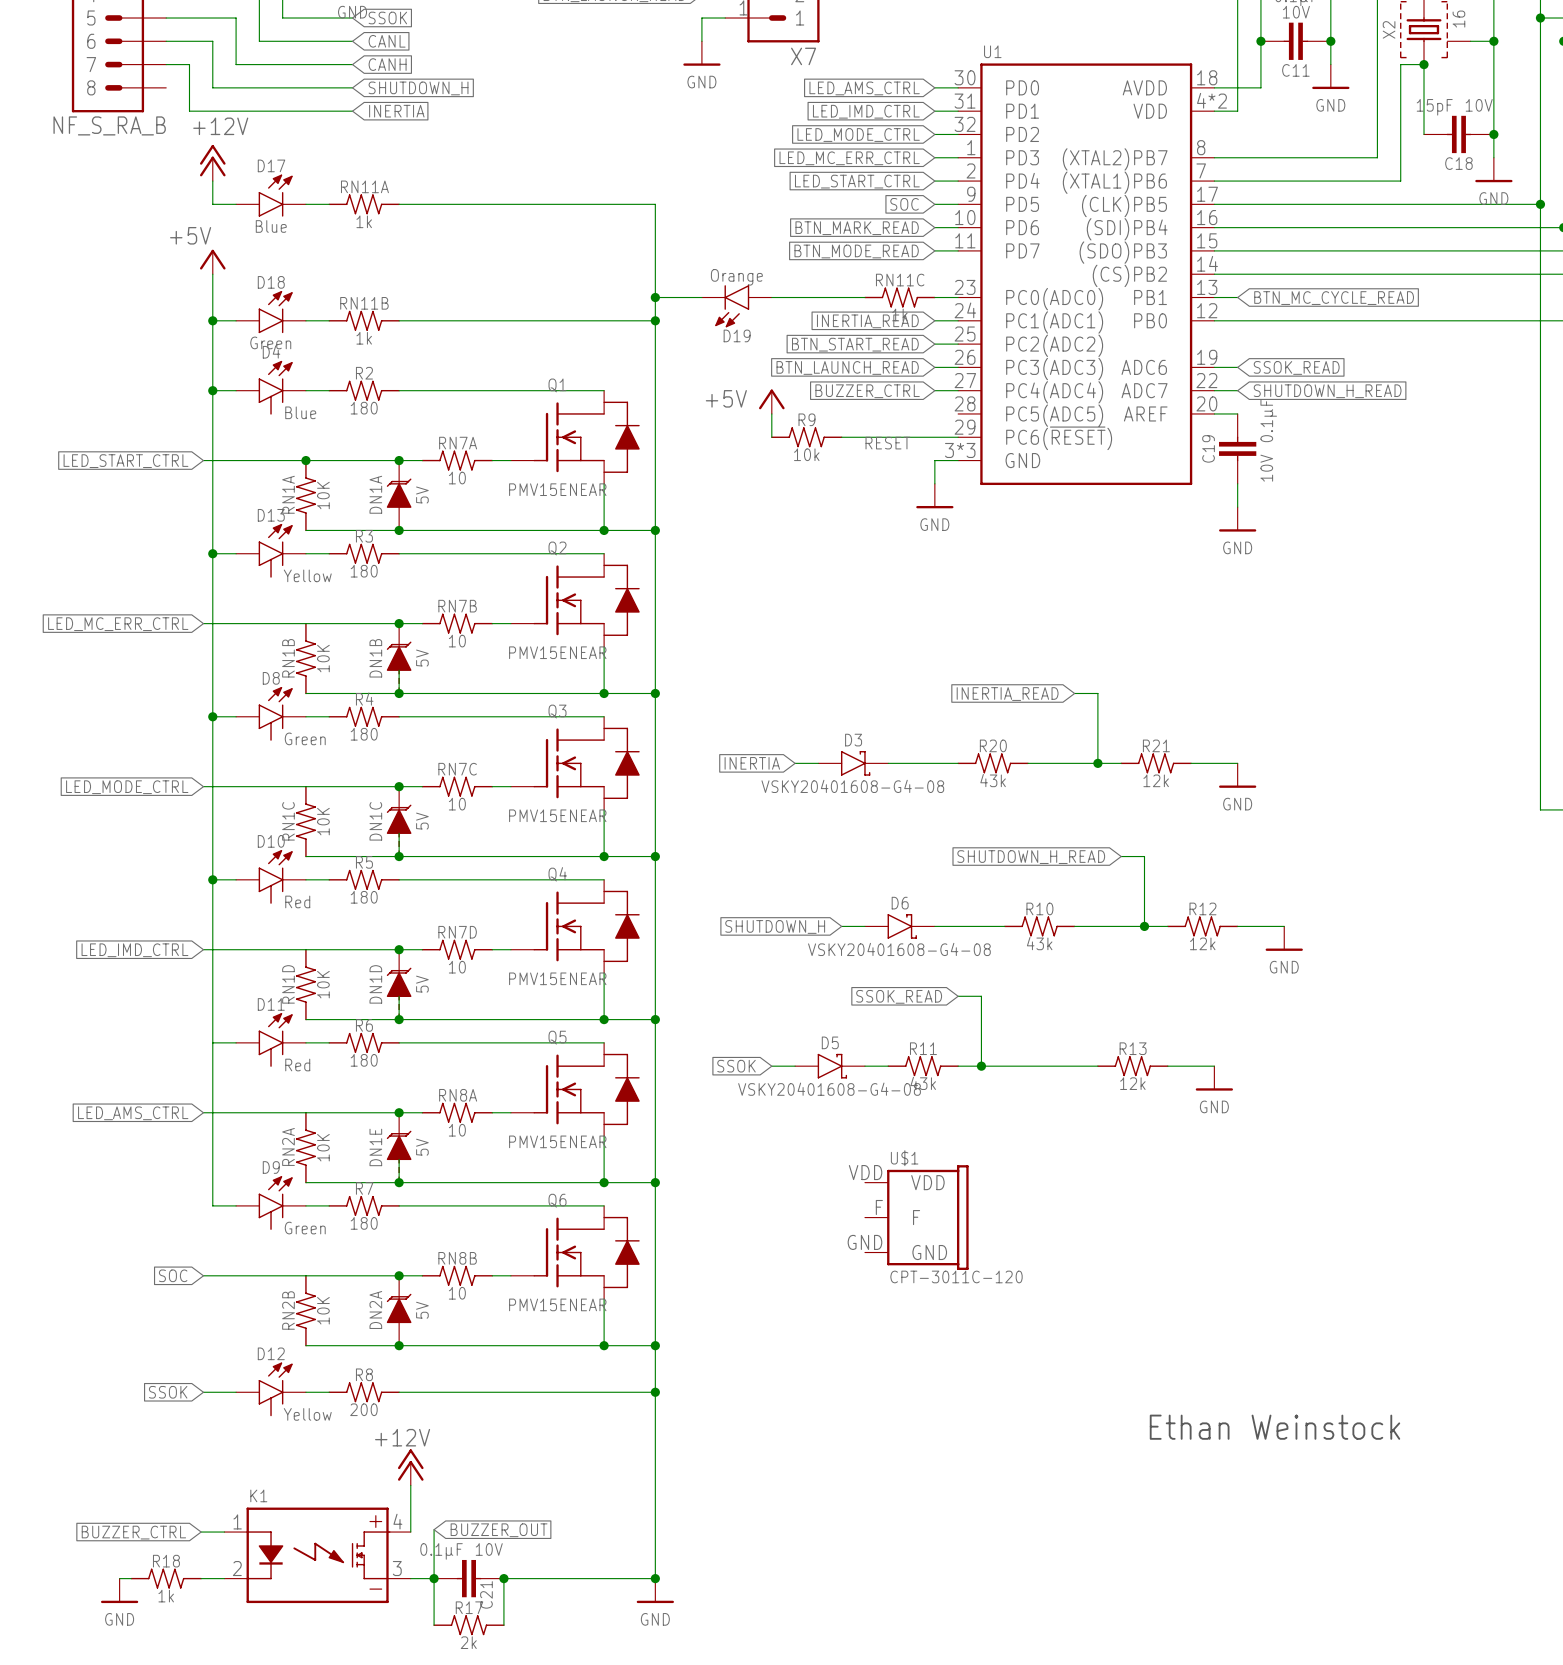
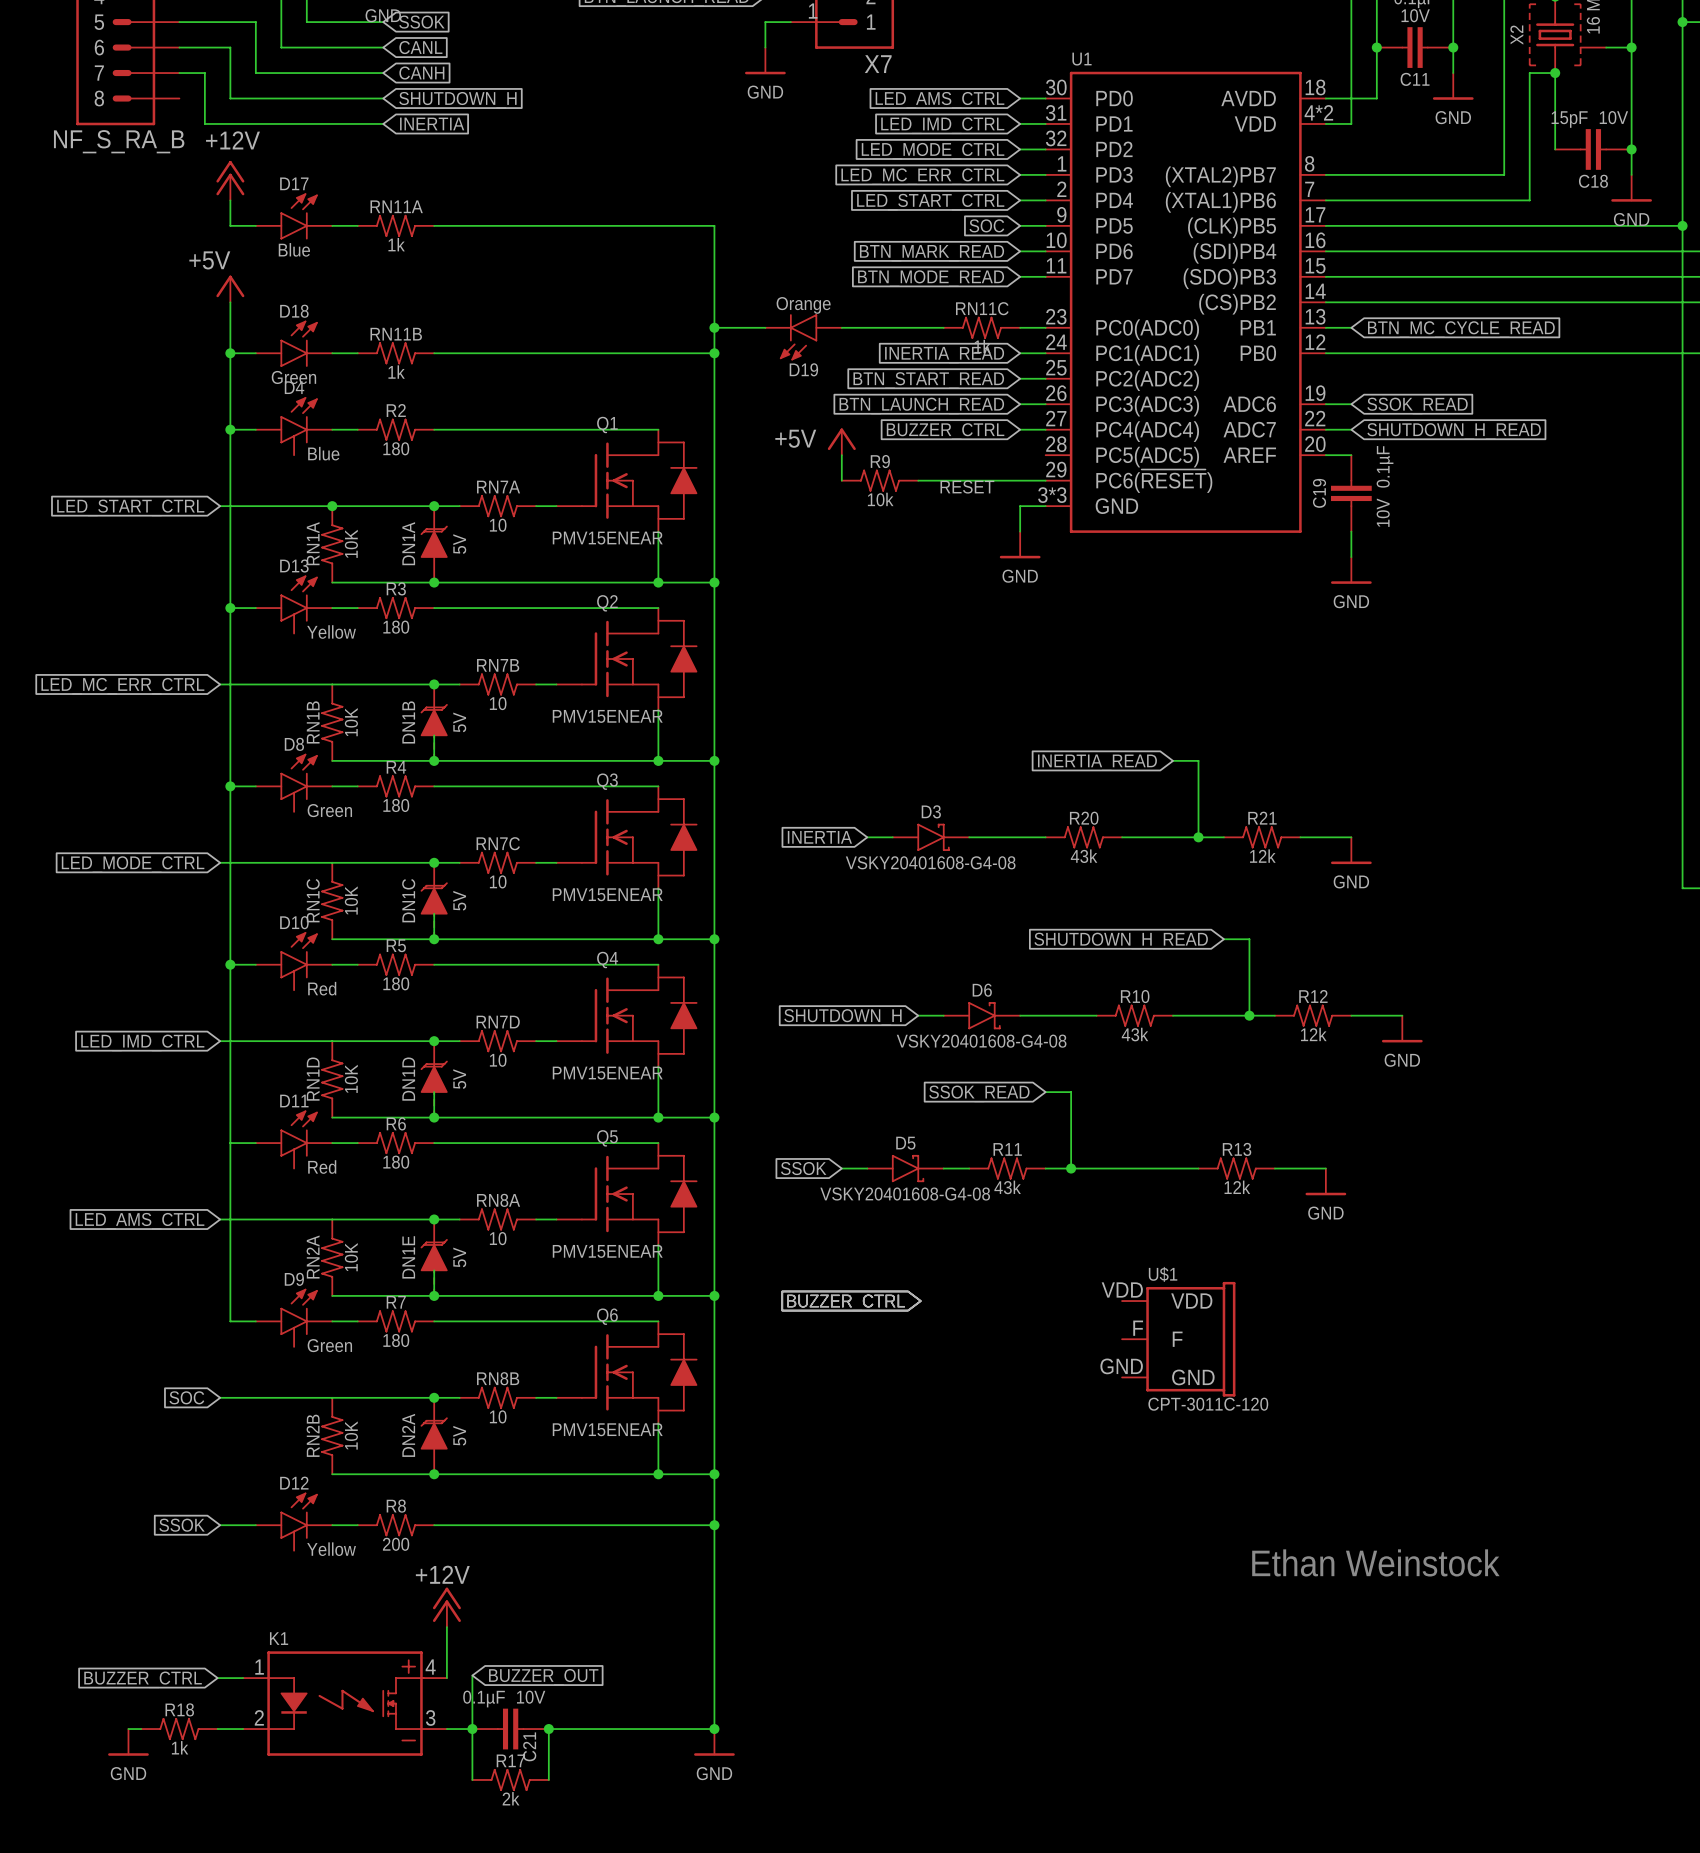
global label: none -> BUZZER_CTRL (846, 1302)
U$1 position: (916, 1217) -> (1178, 1339)

